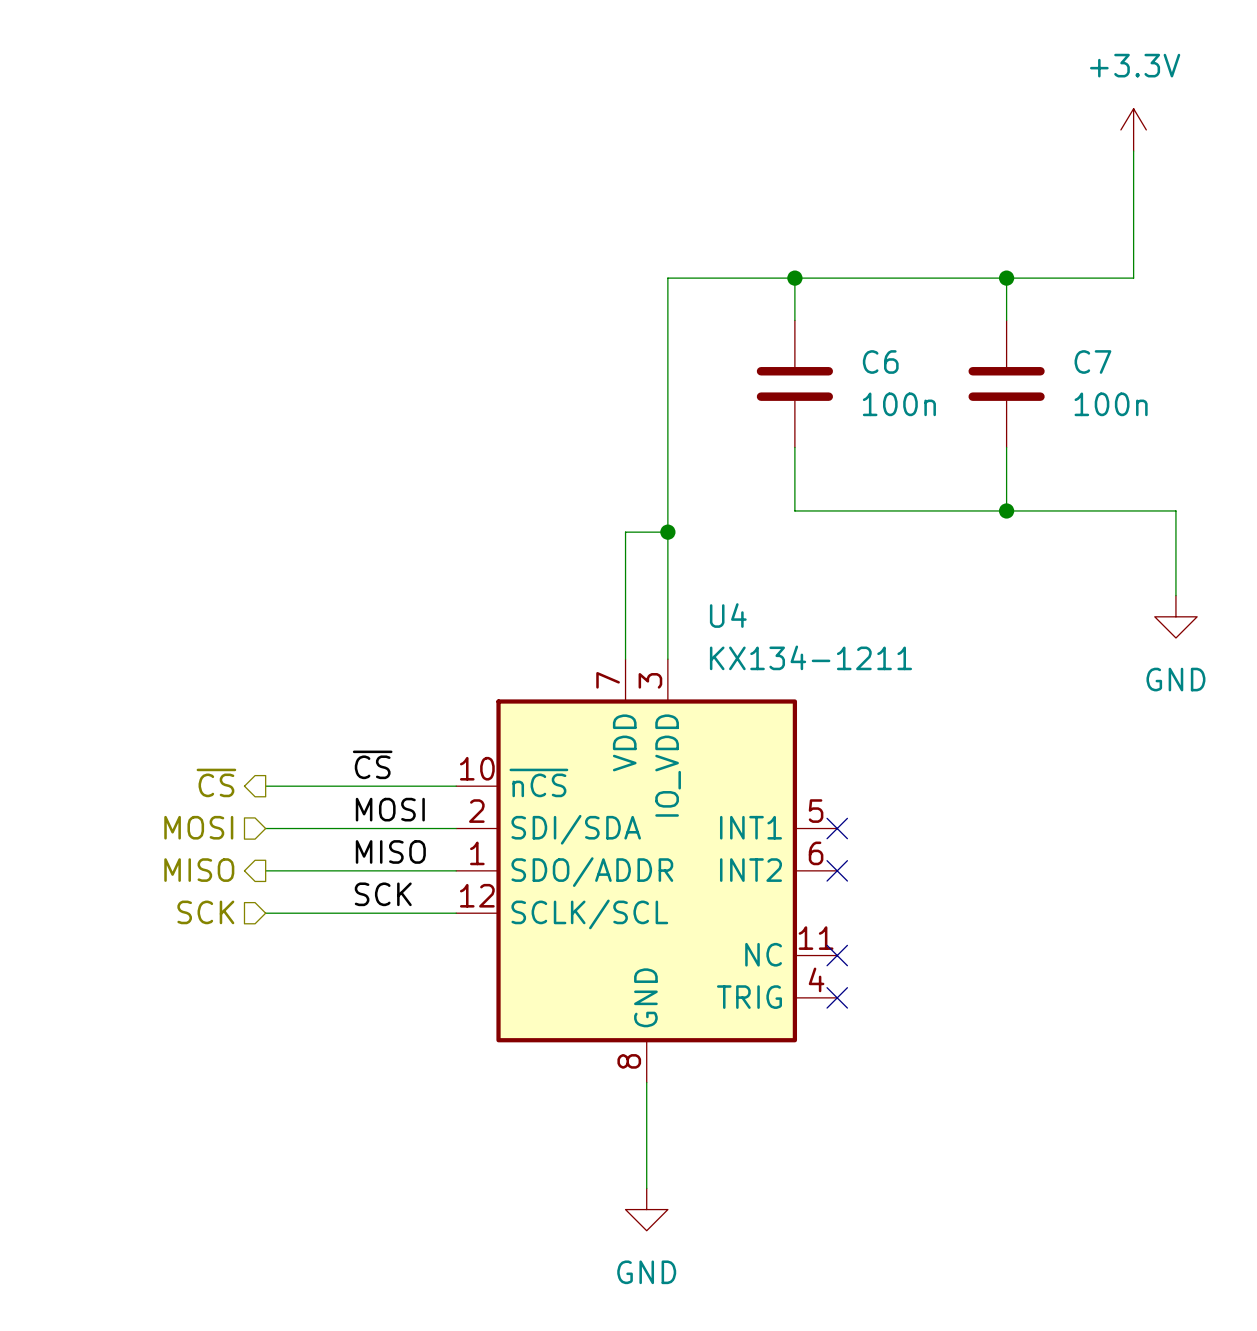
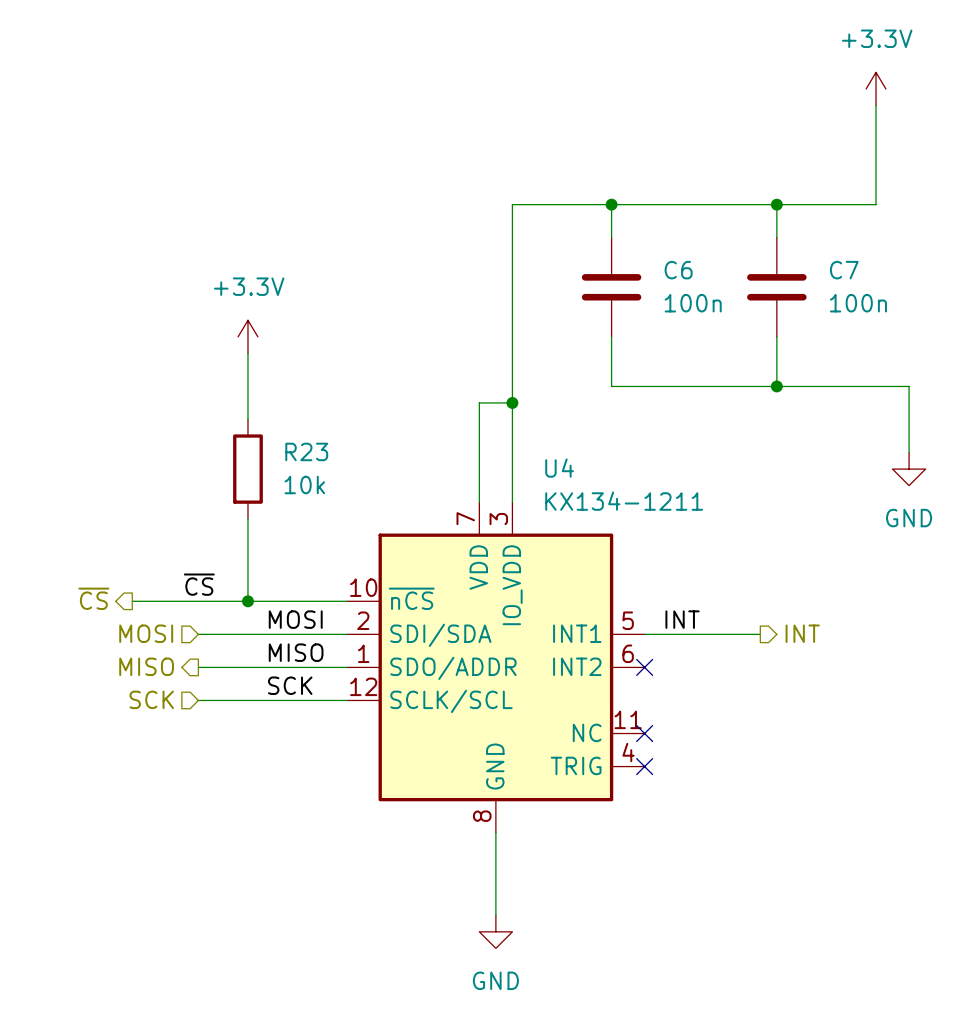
power symbol: none -> +3.3V (247, 336)
wire: none -> (247, 353) (247, 419)
R23: none -> 10k (247, 469)
wire: none -> (247, 518) (247, 601)
label position: ~{CS} (372, 764) -> ~{CS} (199, 584)
hierarchical label position: ~{CS} (216, 782) -> ~{CS} (93, 598)
wire: none -> (132, 601) (198, 601)
junction: none -> (247, 601)
label: none -> INT (682, 619)
hierarchical label: none -> INT (802, 633)
wire: none -> (644, 634) (760, 634)
no-connect mark: (837, 828) -> none

